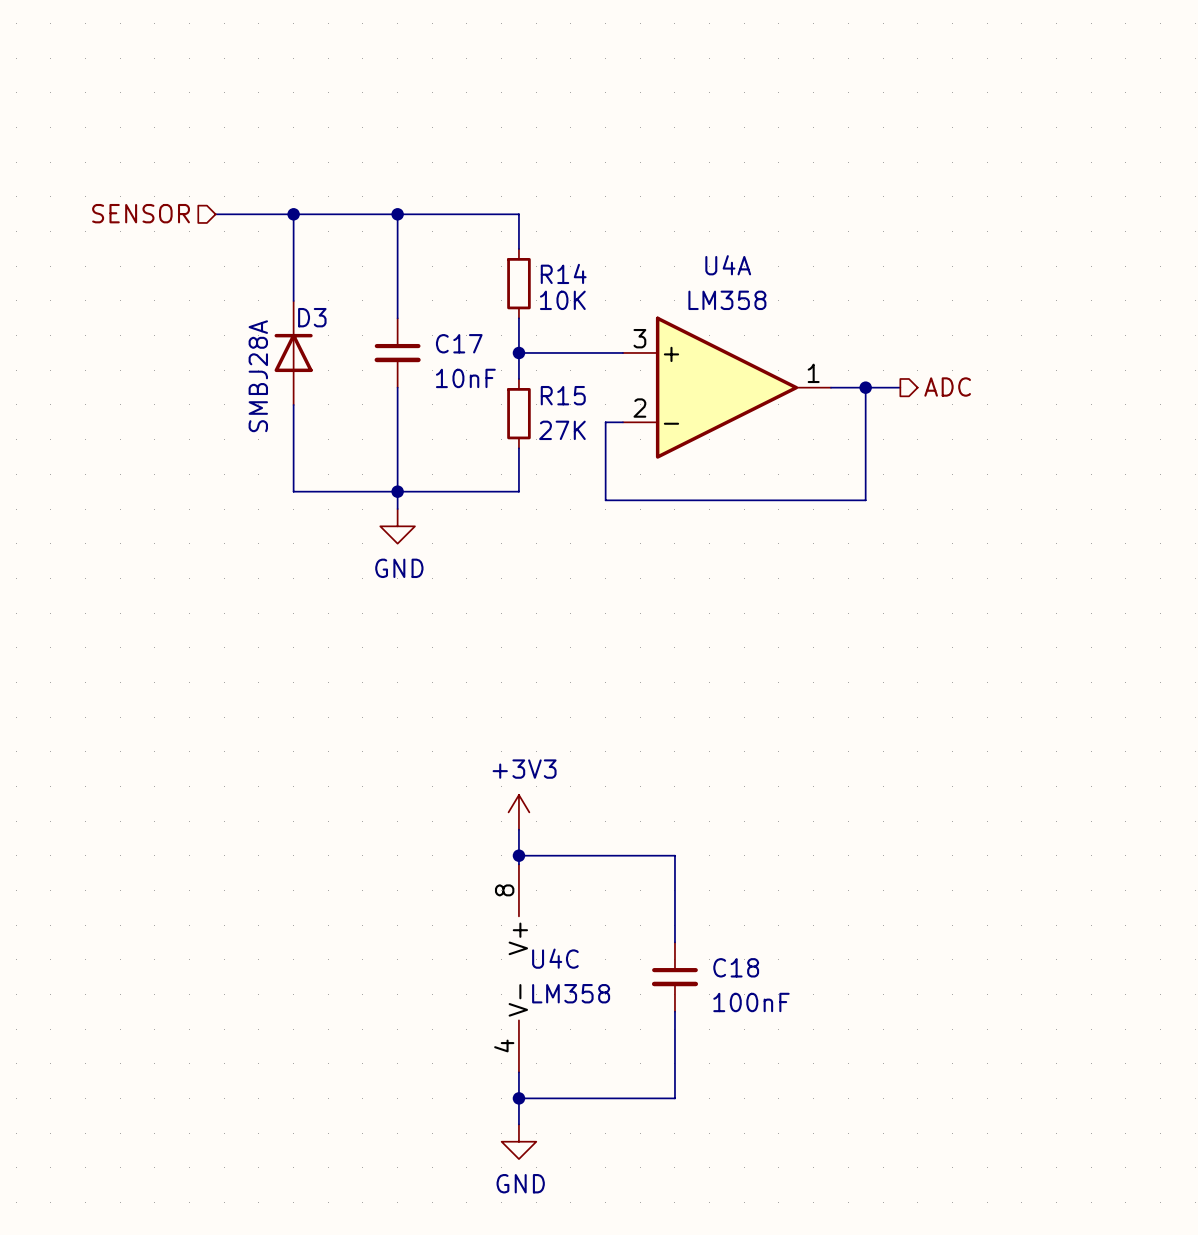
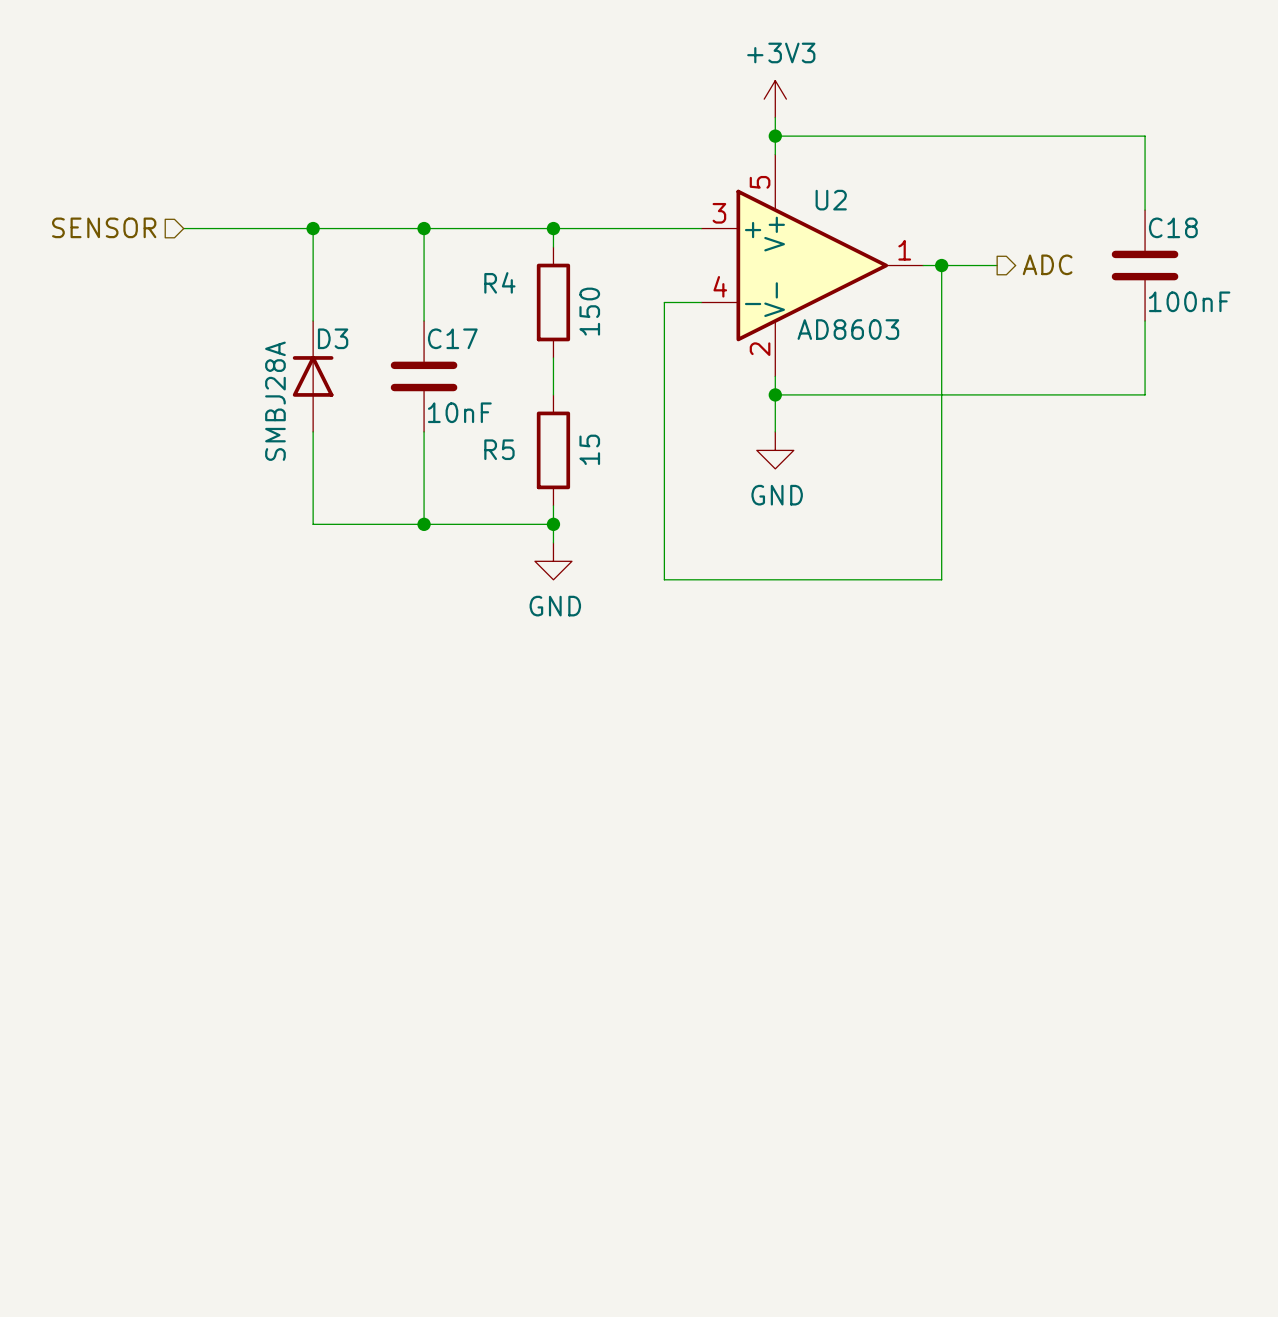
power symbol: none -> +3V3 (775, 99)
wire: none -> (775, 117) (775, 154)
wire: none -> (775, 136) (1145, 136) (1145, 210)
junction: none -> (775, 136)
hierarchical label position: SENSOR (141, 213) -> SENSOR (104, 227)
wire: none -> (183, 228) (229, 228)
wire: none -> (553, 228) (701, 228)
junction: none -> (553, 228)
U2: none -> AD8603 (812, 265)
wire: none -> (941, 265) (941, 579) (664, 579) (664, 302) (701, 302)
junction: none -> (941, 265)
R14: 10K (518, 283) -> none
R4: none -> 150 (553, 302)
wire: none -> (1145, 320) (1145, 394) (775, 394)
C17 symbol: [374, 318, 421, 388] -> [390, 320, 458, 432]
C17 name position: C17 (459, 343) -> C17 (452, 338)
wire: (518, 352) (622, 352) -> none
junction: (518, 352) -> none
junction: none -> (775, 394)
C17 value position: 10nF (465, 378) -> 10nF (459, 412)
U4A: LM358 (726, 387) -> none
wire: (830, 387) (900, 387) -> (923, 265) (997, 265)
wire: (865, 387) (865, 500) (605, 500) (605, 422) (622, 422) -> none
junction: (865, 387) -> none
hierarchical label position: ADC (947, 387) -> ADC (1047, 264)
R15: 27K (518, 413) -> none
R5: none -> 15 (553, 450)
power symbol: none -> GND (775, 450)
wire: (397, 491) (397, 509) -> (553, 524) (553, 542)
junction: none -> (553, 524)
power symbol position: GND (397, 526) -> GND (553, 561)
power symbol: +3V3 (518, 812) -> none
wire: (518, 829) (518, 864) -> none
wire: (518, 855) (674, 855) (674, 942) -> none
junction: (518, 855) -> none
C18 symbol: [651, 942, 699, 1012] -> [1111, 210, 1179, 321]
C18 name position: C18 (736, 967) -> C18 (1173, 227)
U4C: LM358 (518, 968) -> none
C18 value position: 100nF (751, 1002) -> 100nF (1189, 301)
wire: (674, 1011) (674, 1098) (518, 1098) -> none
wire: (518, 1072) (518, 1124) -> none
junction: (518, 1098) -> none
power symbol: GND (518, 1141) -> none

